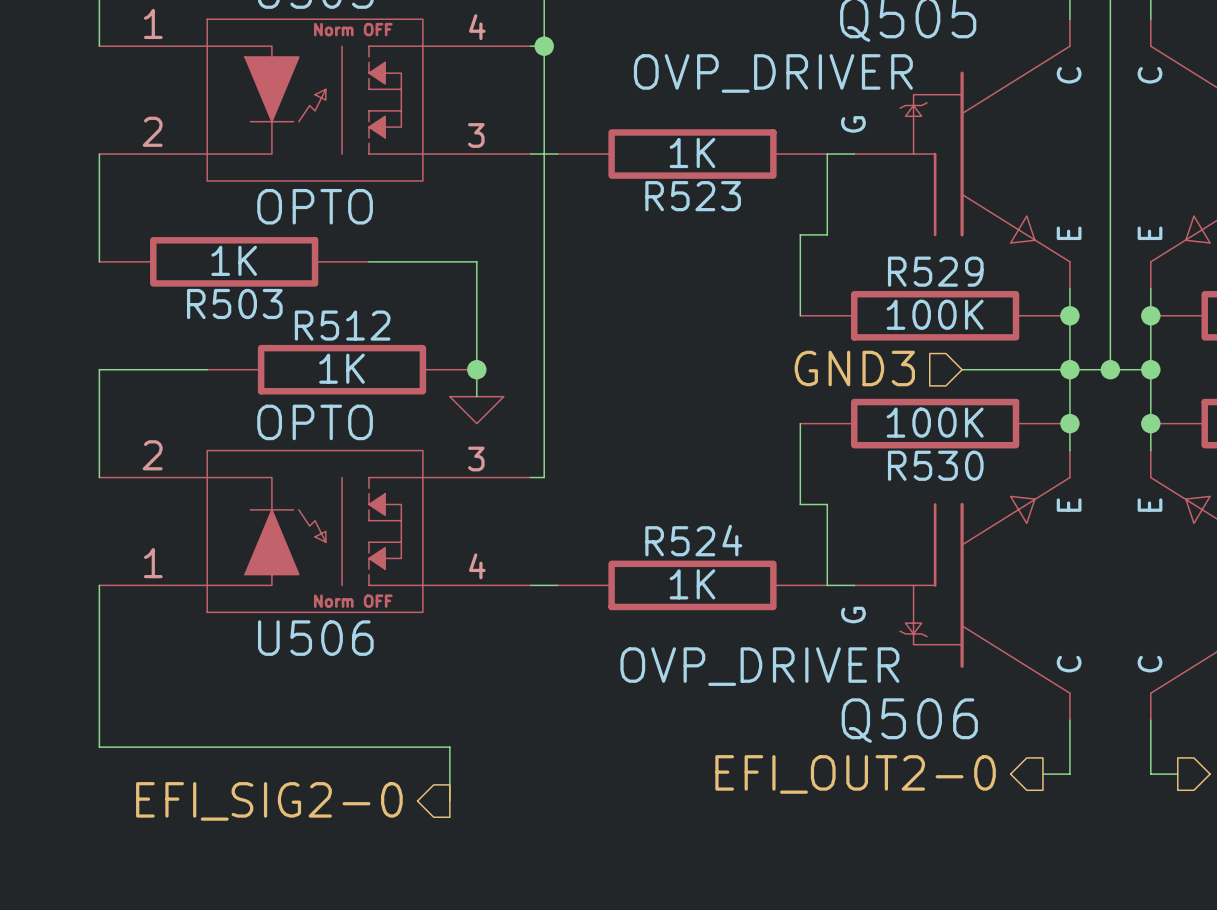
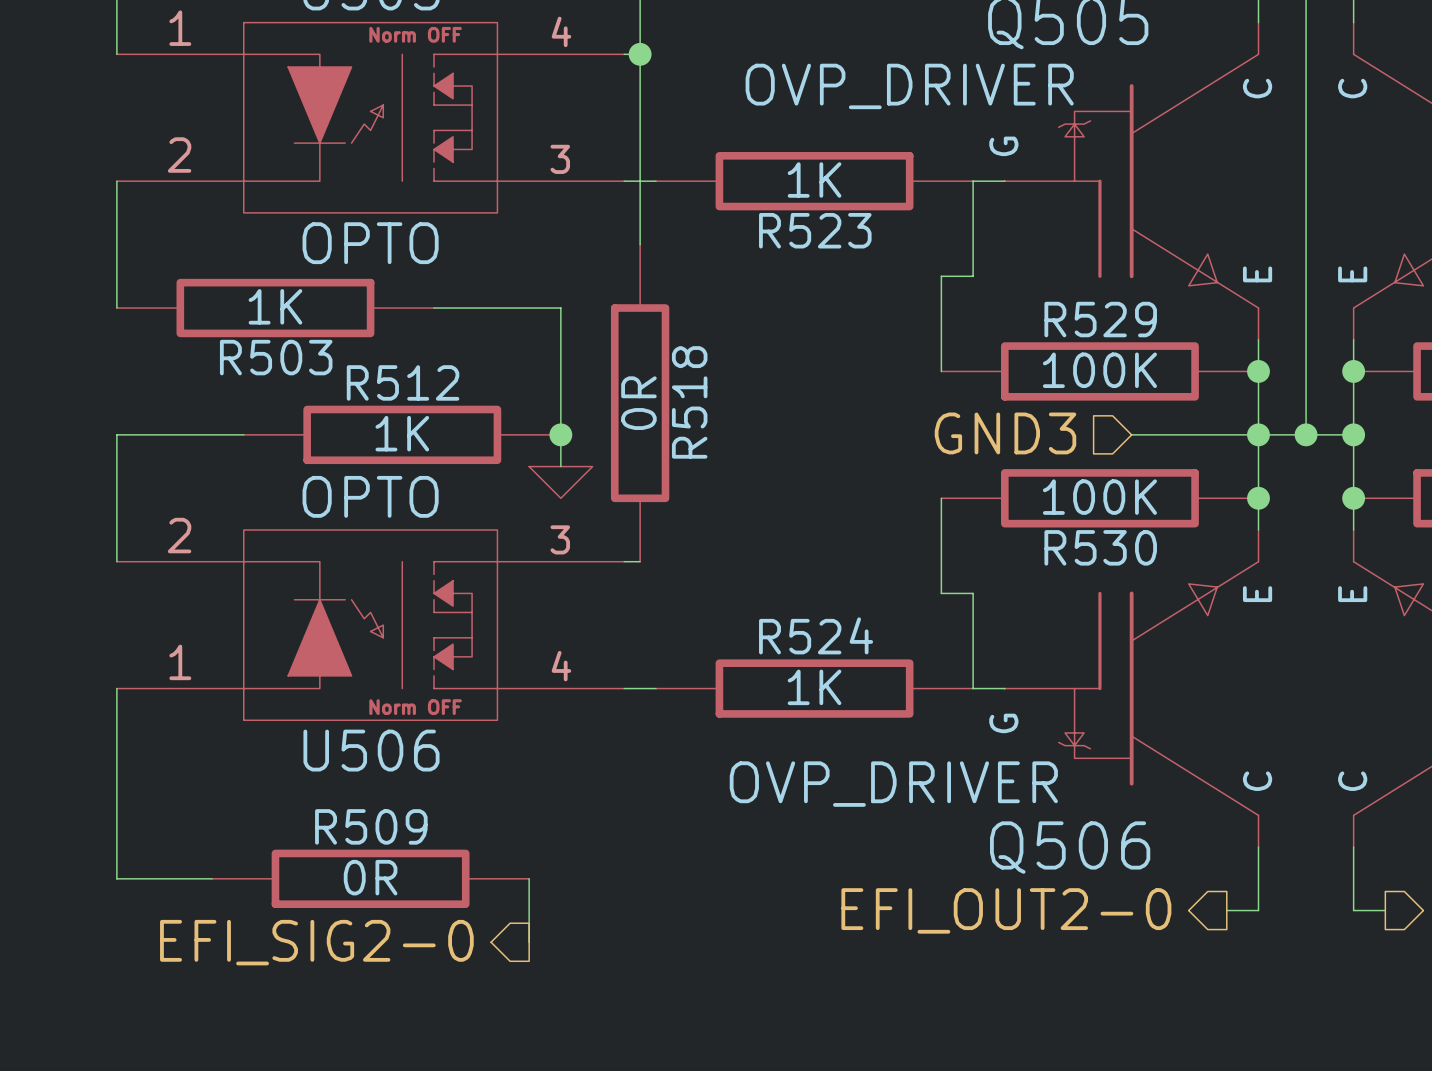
wire: (544, 207) (544, 477) -> none
R518: none -> 0R (640, 403)
wire: (180, 747) (449, 747) -> none
R509: none -> 0R (370, 878)

